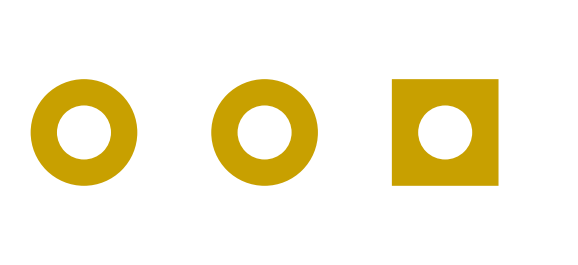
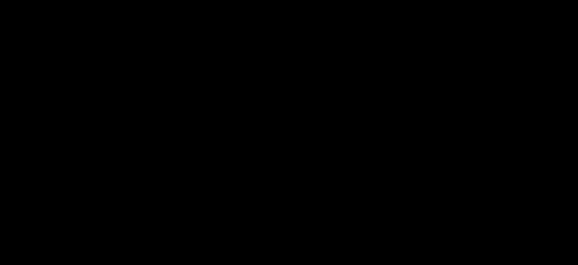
part: (264, 132) -> none

